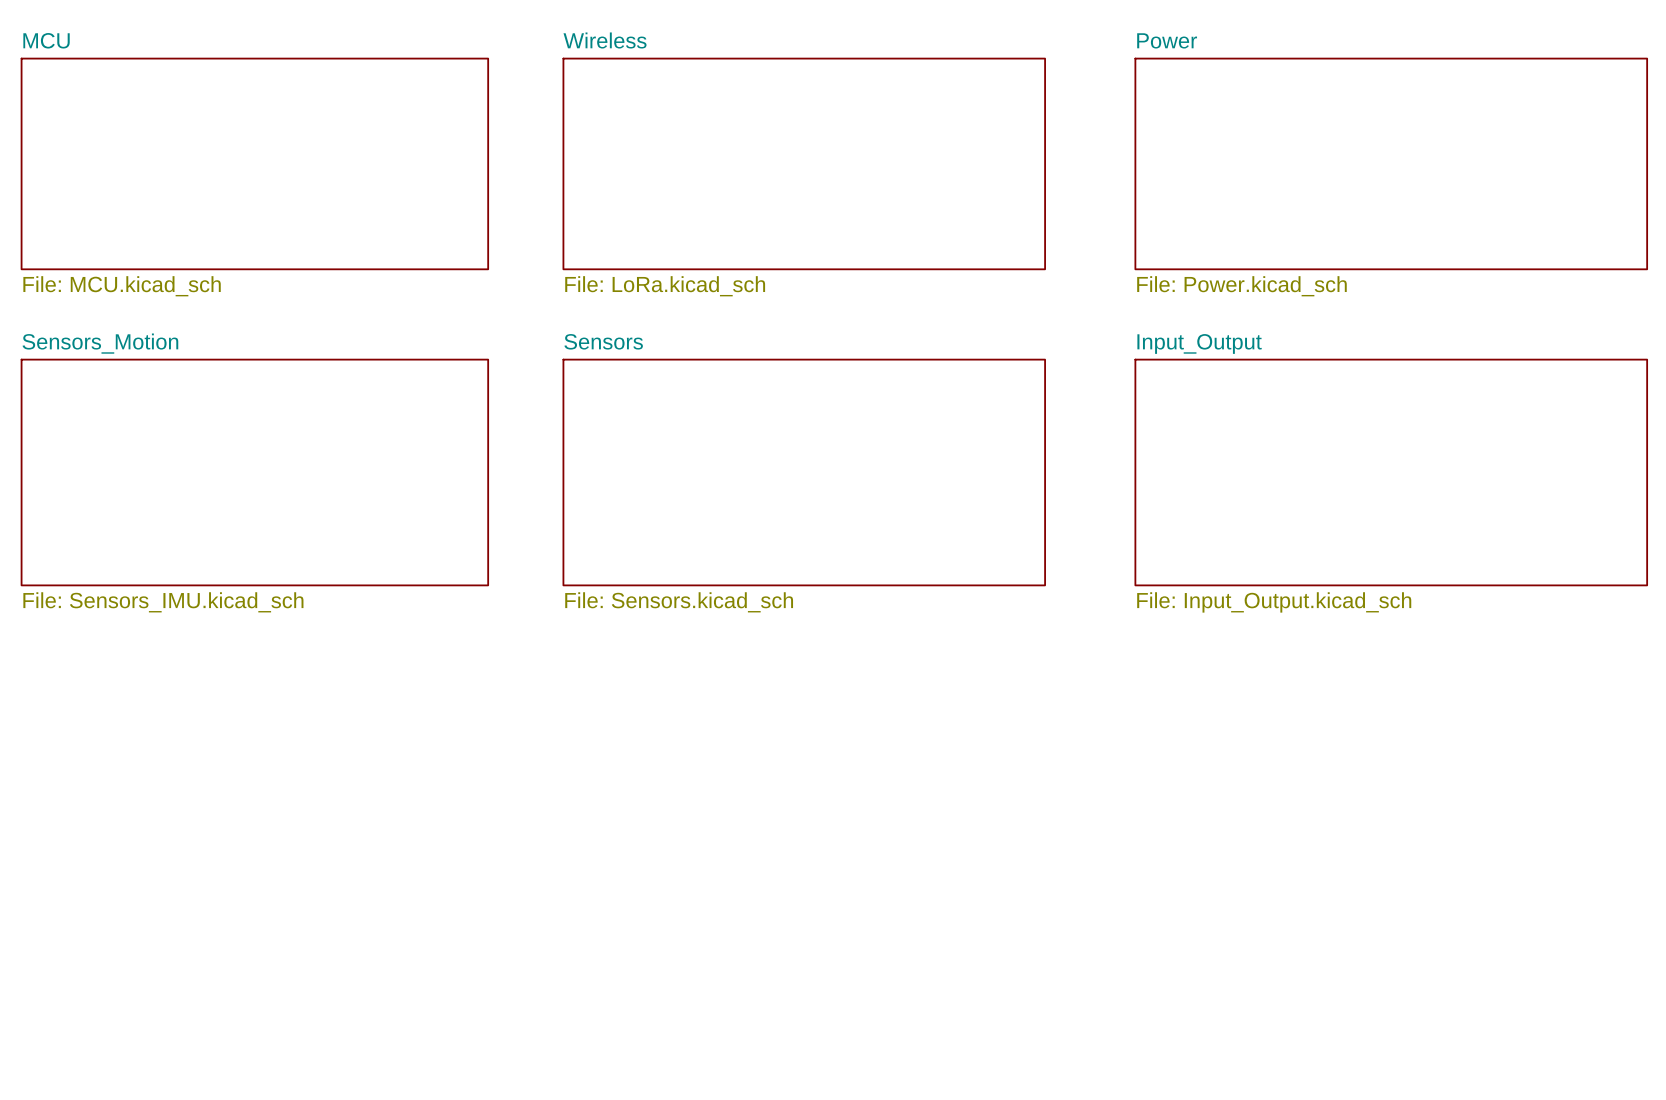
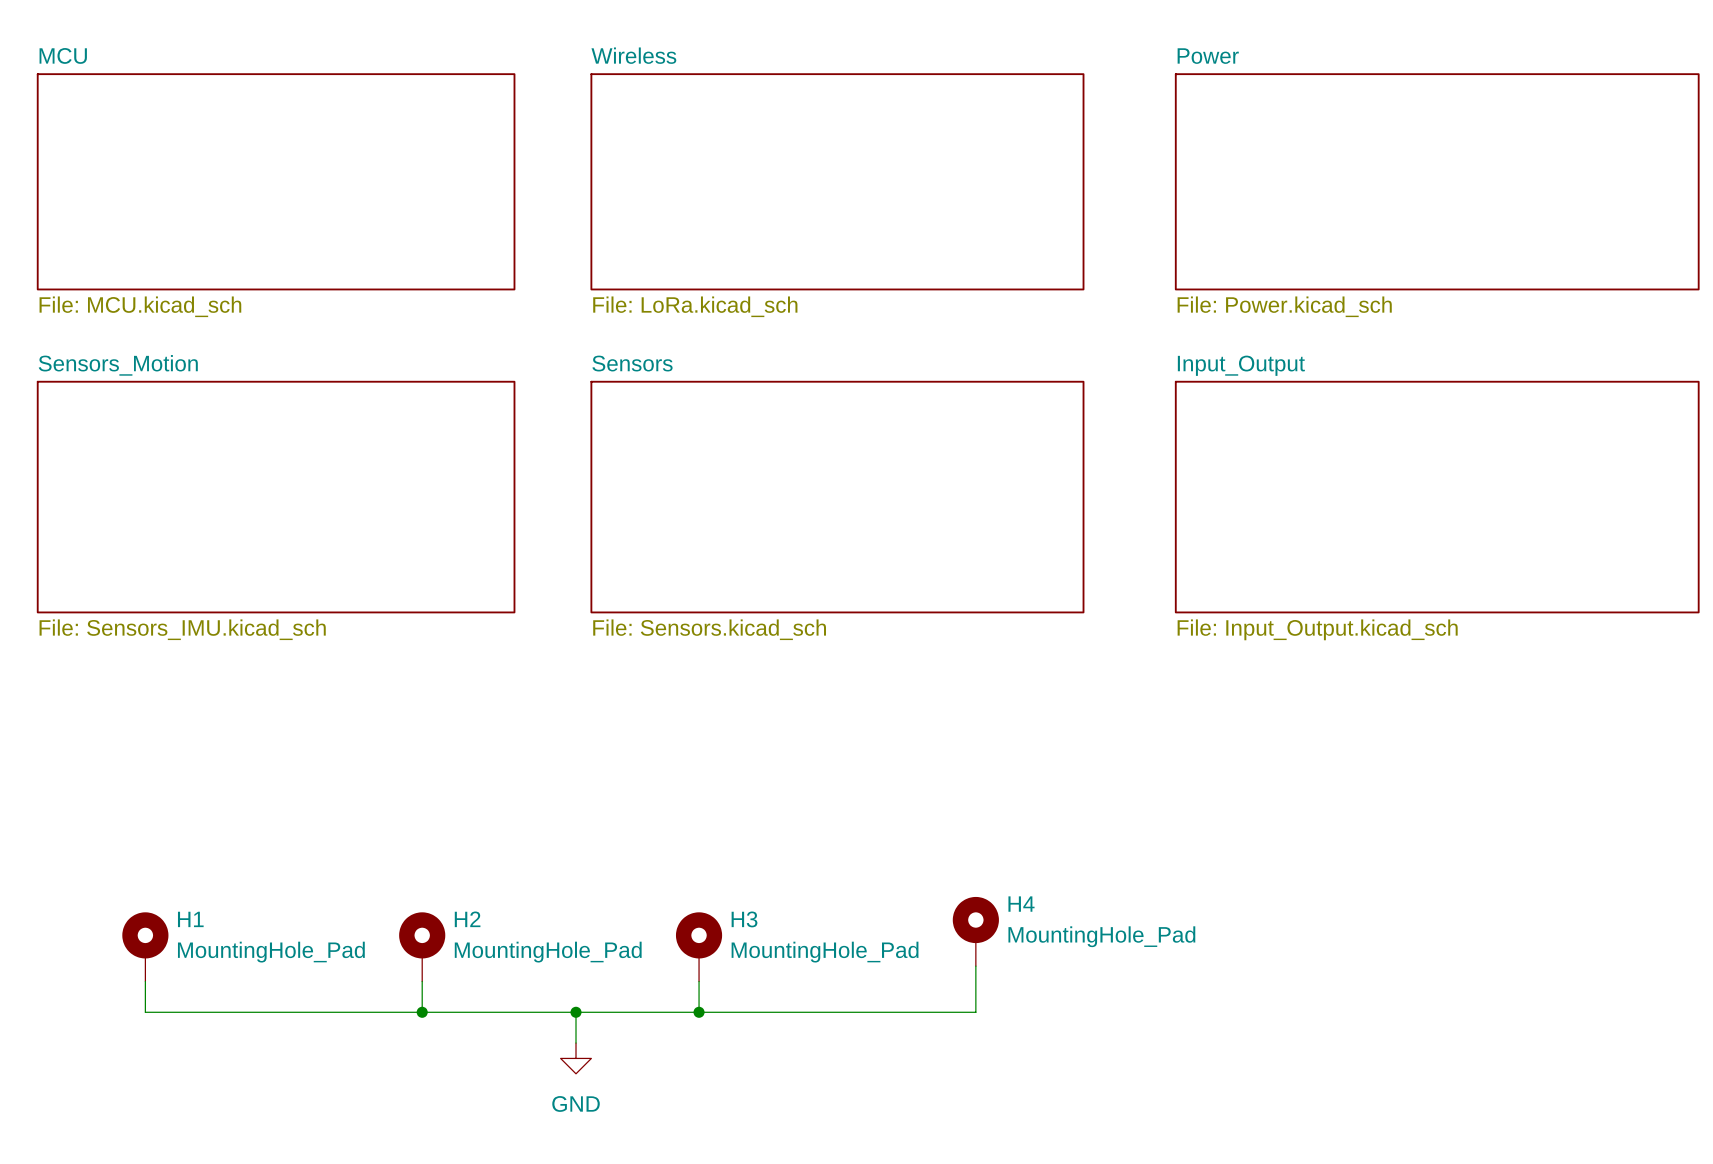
H4: none -> MountingHole_Pad (975, 931)
H1: none -> MountingHole_Pad (145, 946)
H2: none -> MountingHole_Pad (422, 946)
H3: none -> MountingHole_Pad (699, 946)
wire: none -> (975, 966) (975, 1012) (145, 1012) (145, 981)
wire: none -> (422, 981) (422, 1012)
wire: none -> (699, 981) (699, 1012)
junction: none -> (422, 1012)
wire: none -> (576, 1012) (576, 1043)
junction: none -> (576, 1012)
junction: none -> (699, 1012)
power symbol: none -> GND (576, 1058)

